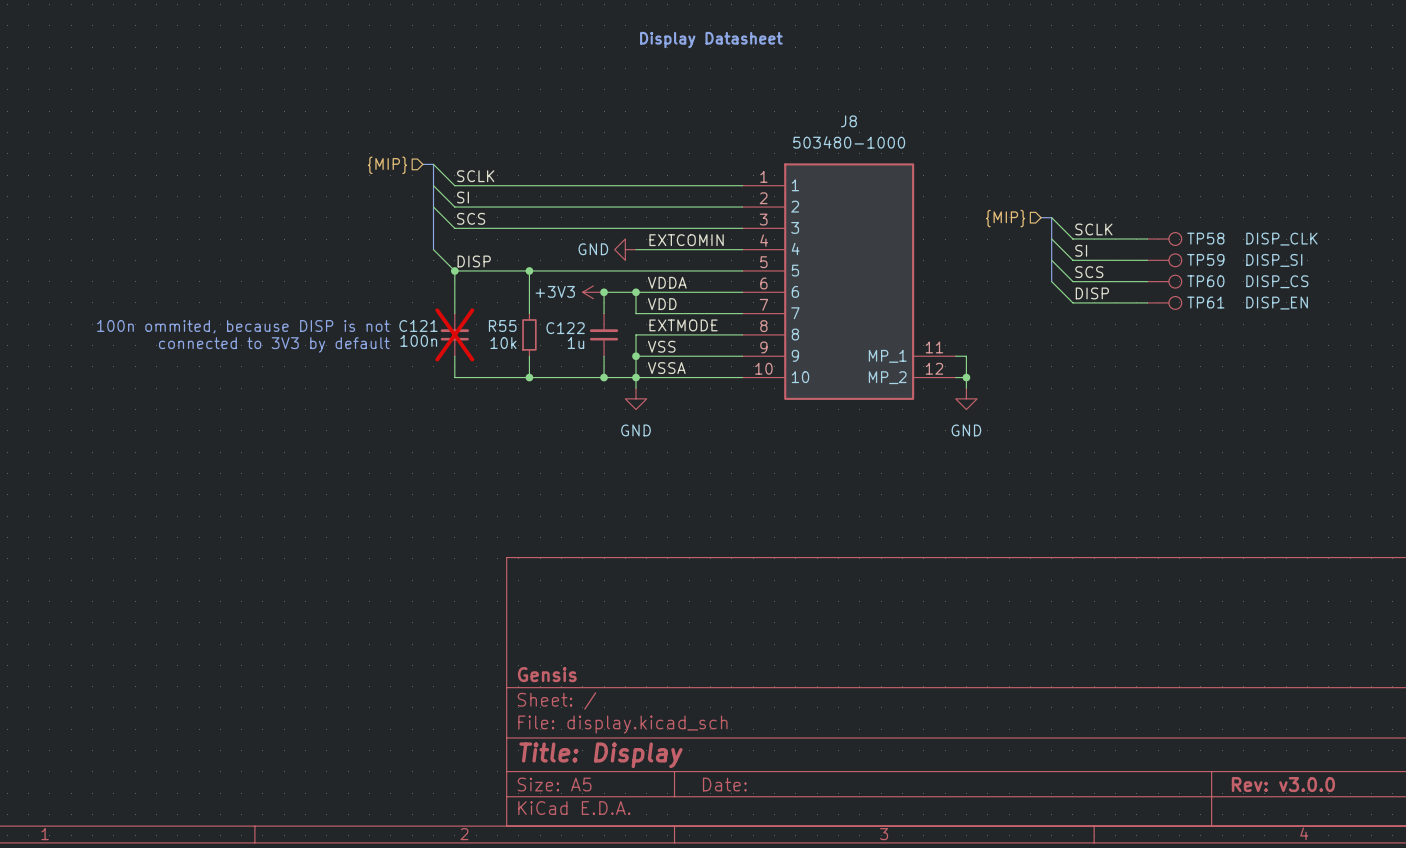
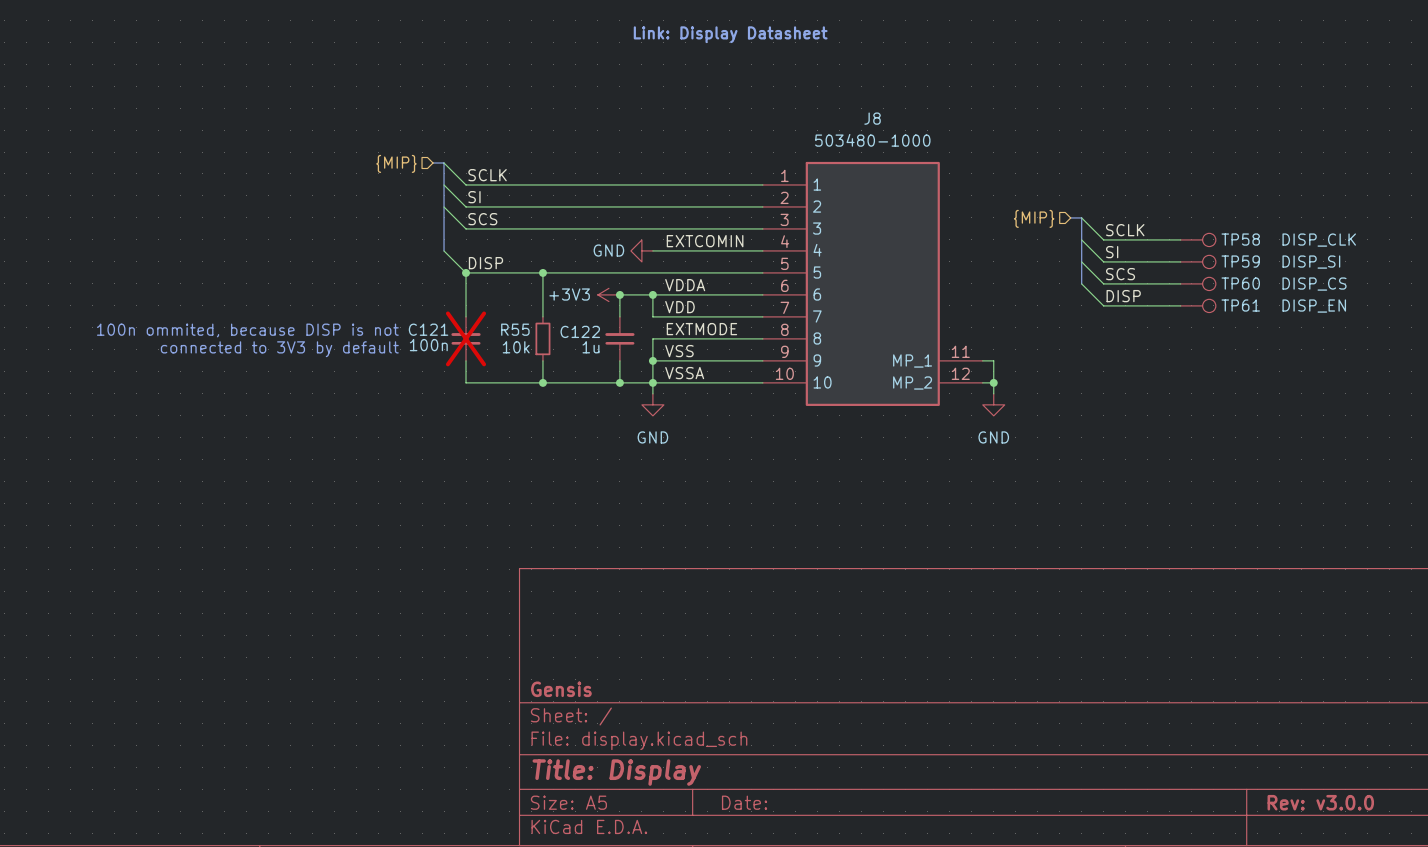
text: Display Datasheet (711, 40) -> Link: Display Datasheet (730, 34)

